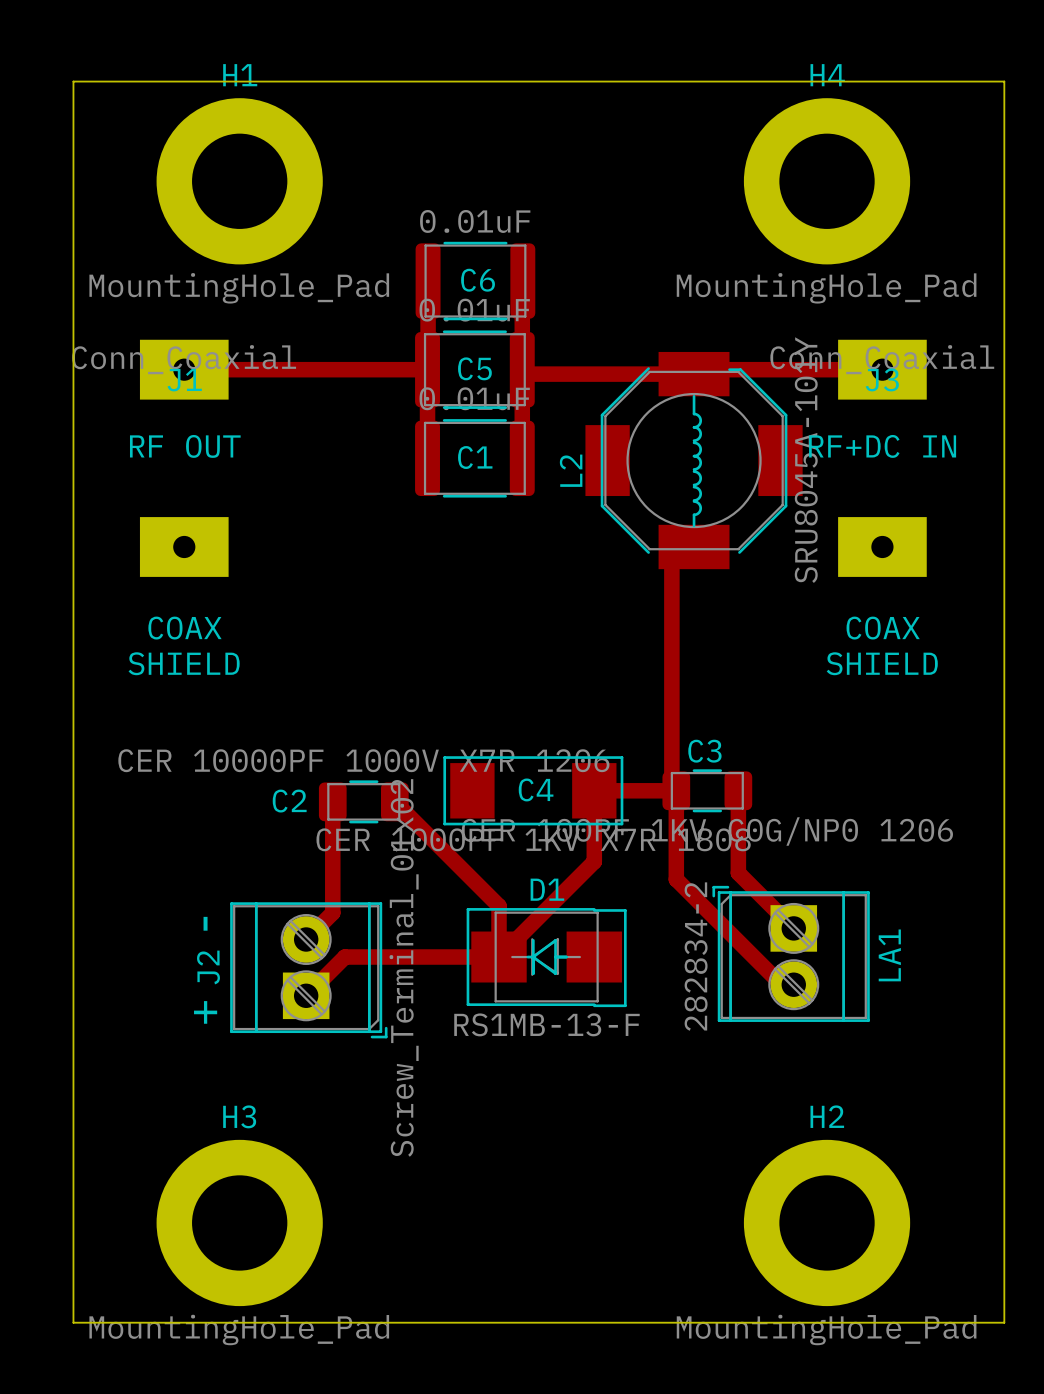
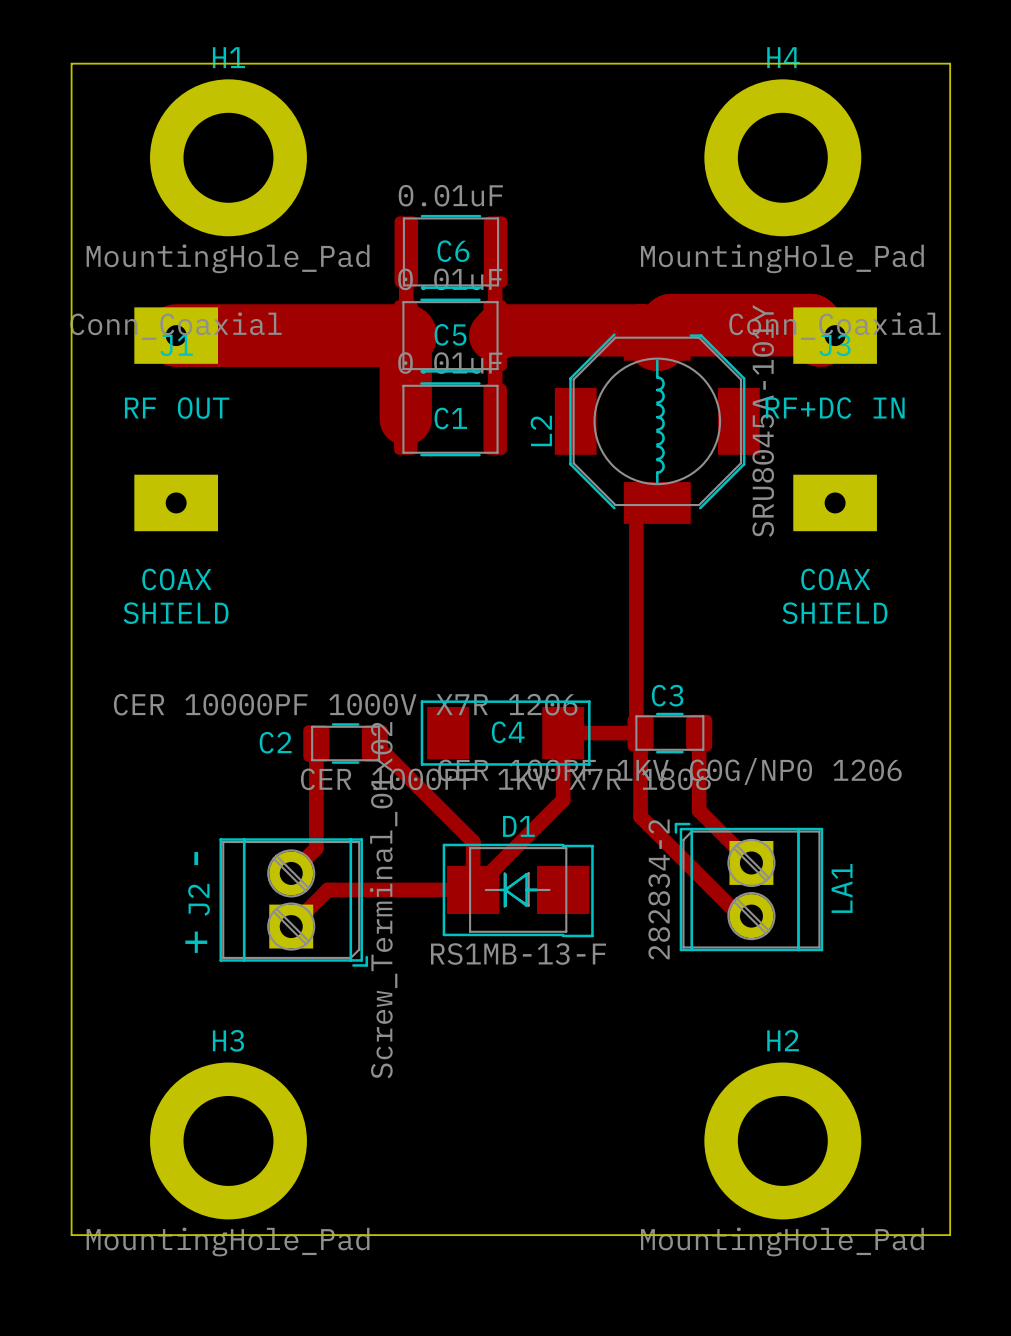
track width: thin (184, 369) (427, 369) (427, 458) -> thick (176, 335) (405, 335) (405, 419)
track: (676, 369) (866, 369) -> (495, 335) (500, 330) (642, 330) (652, 339) (657, 339) (671, 325) (810, 325) (820, 335)
track: (526, 374) (671, 374) -> none

